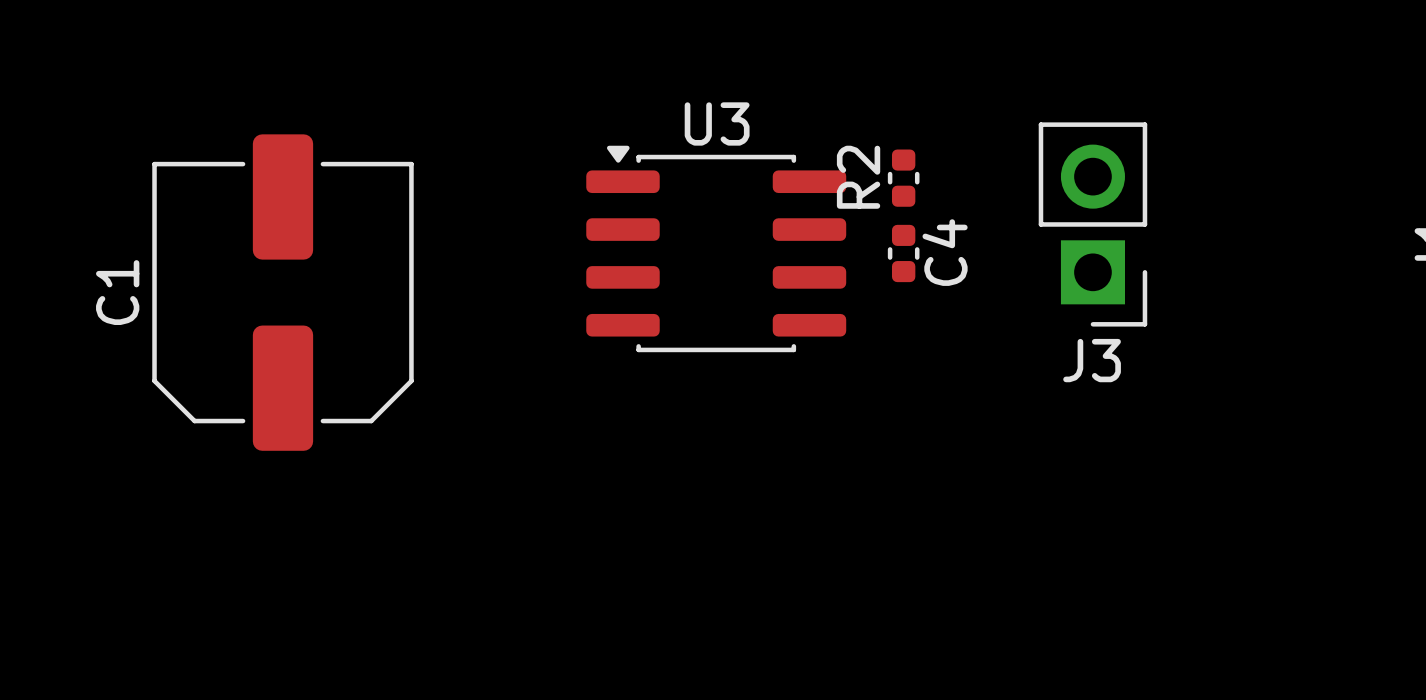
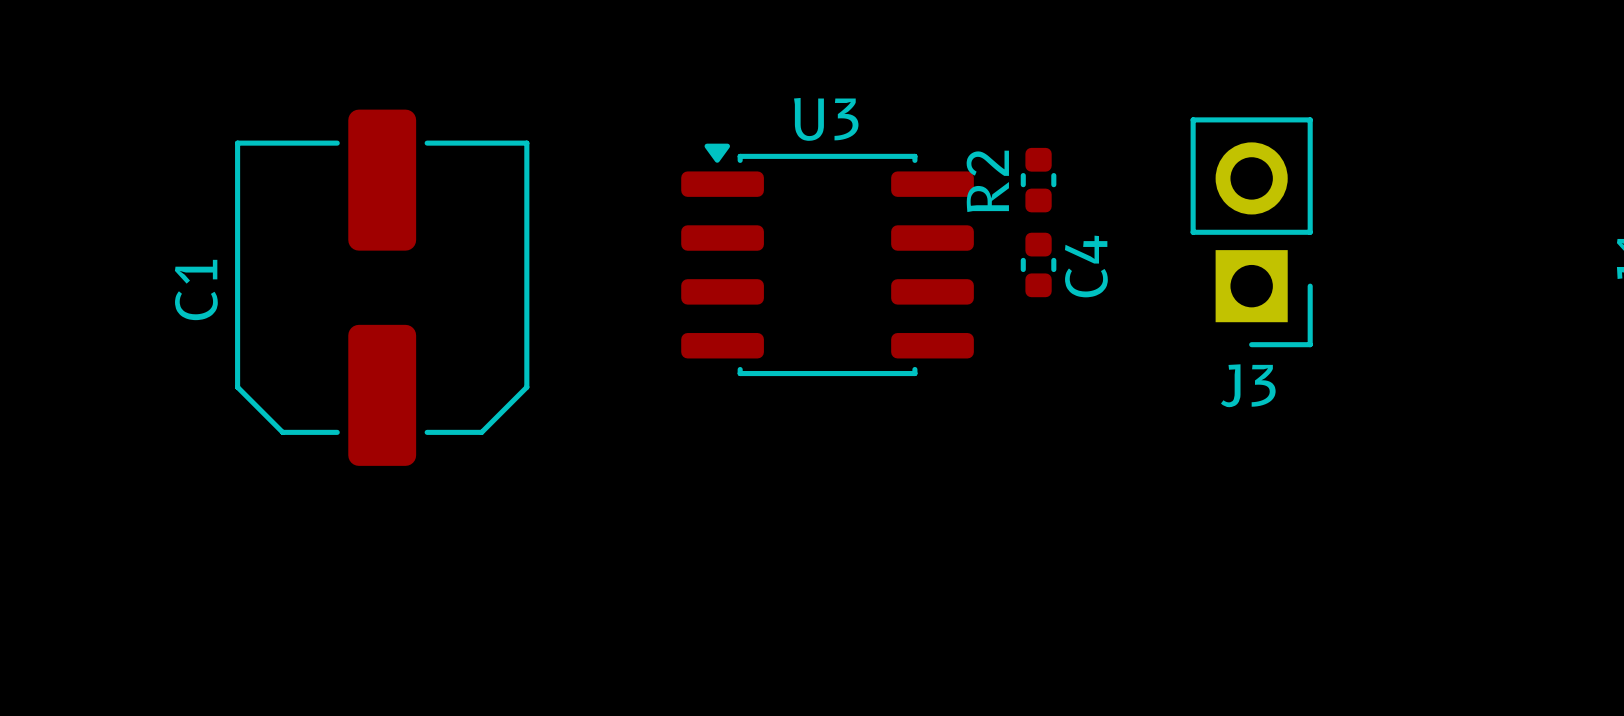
C1 position: (282, 292) -> (382, 287)

